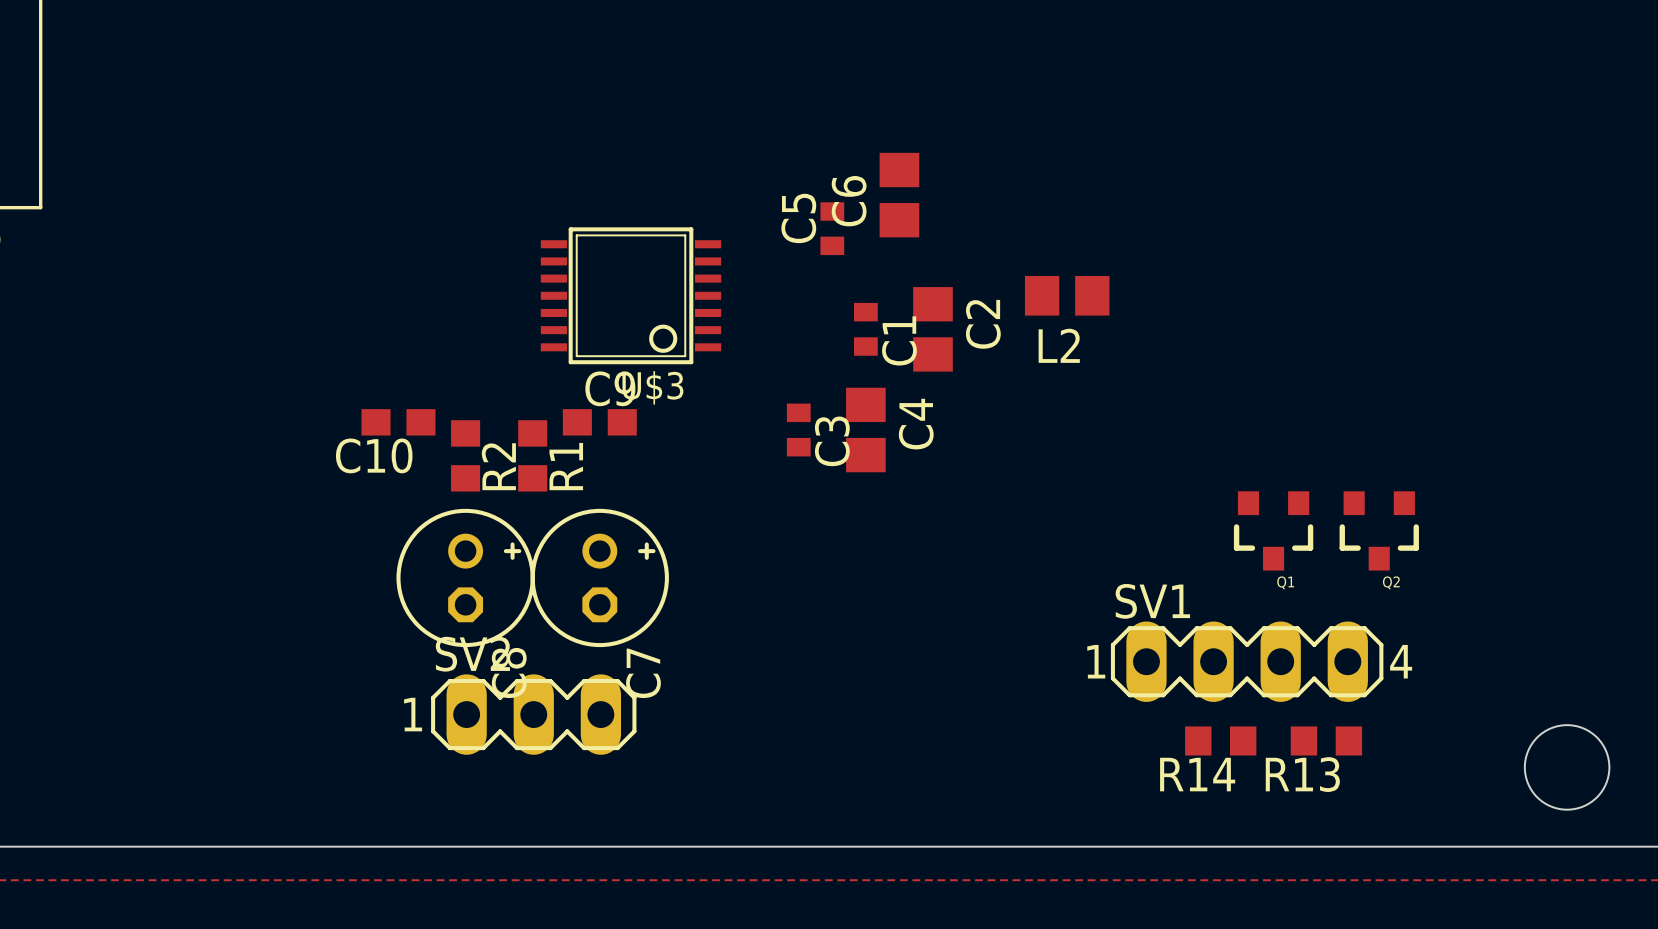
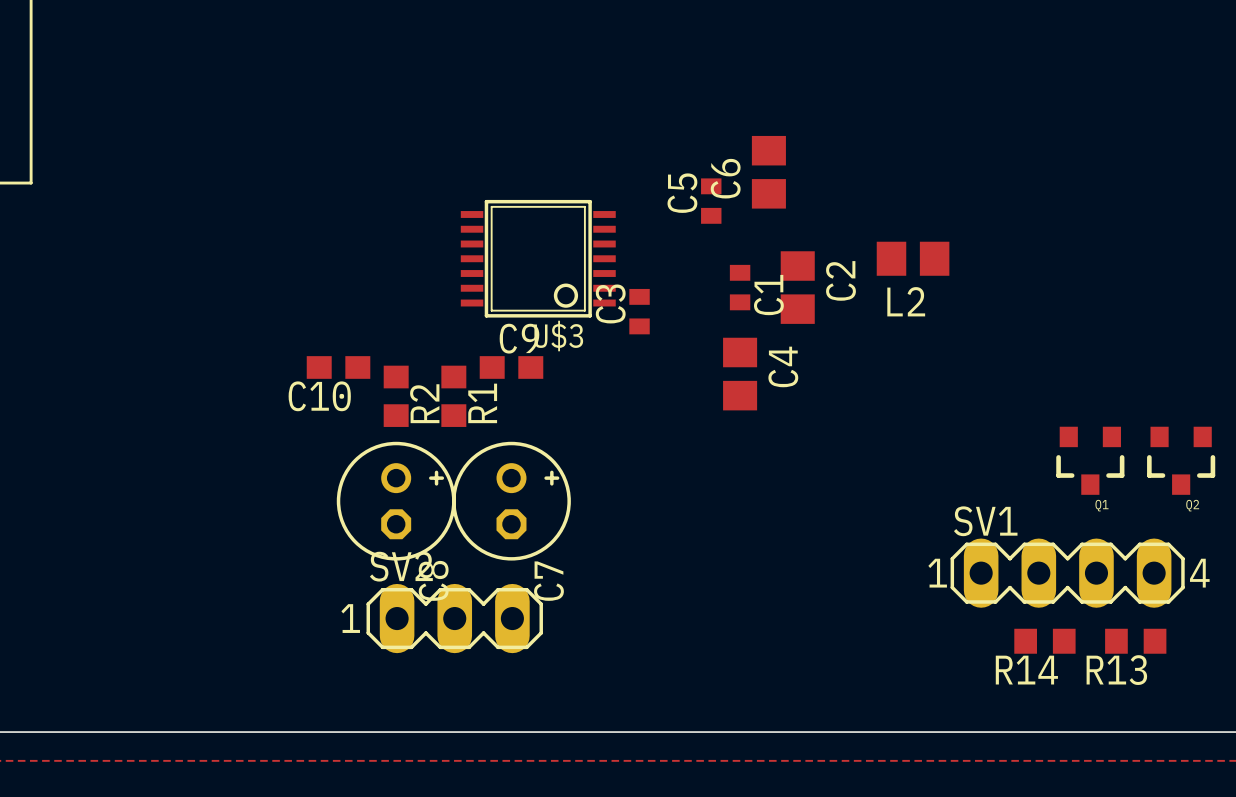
C3 position: (798, 430) -> (639, 311)
C3 name position: C3 (832, 441) -> C3 (610, 303)

